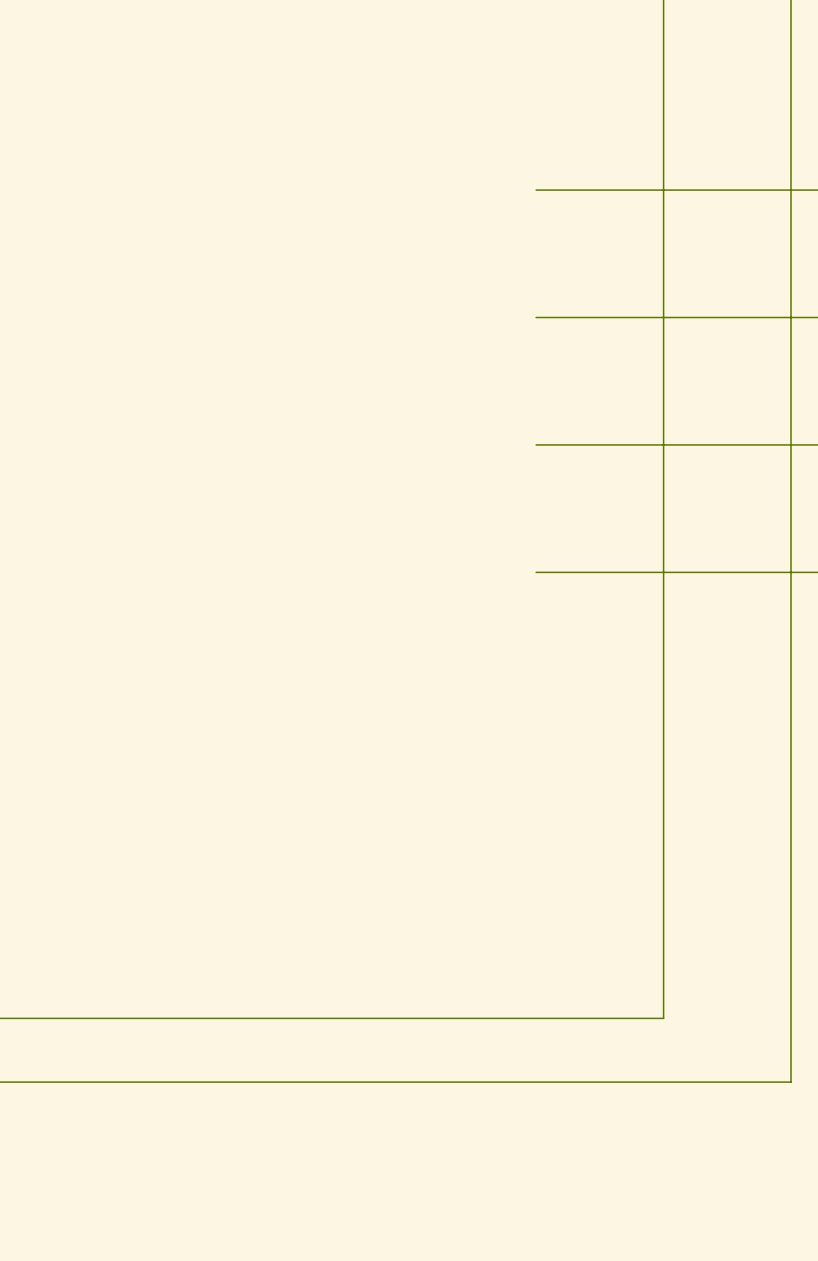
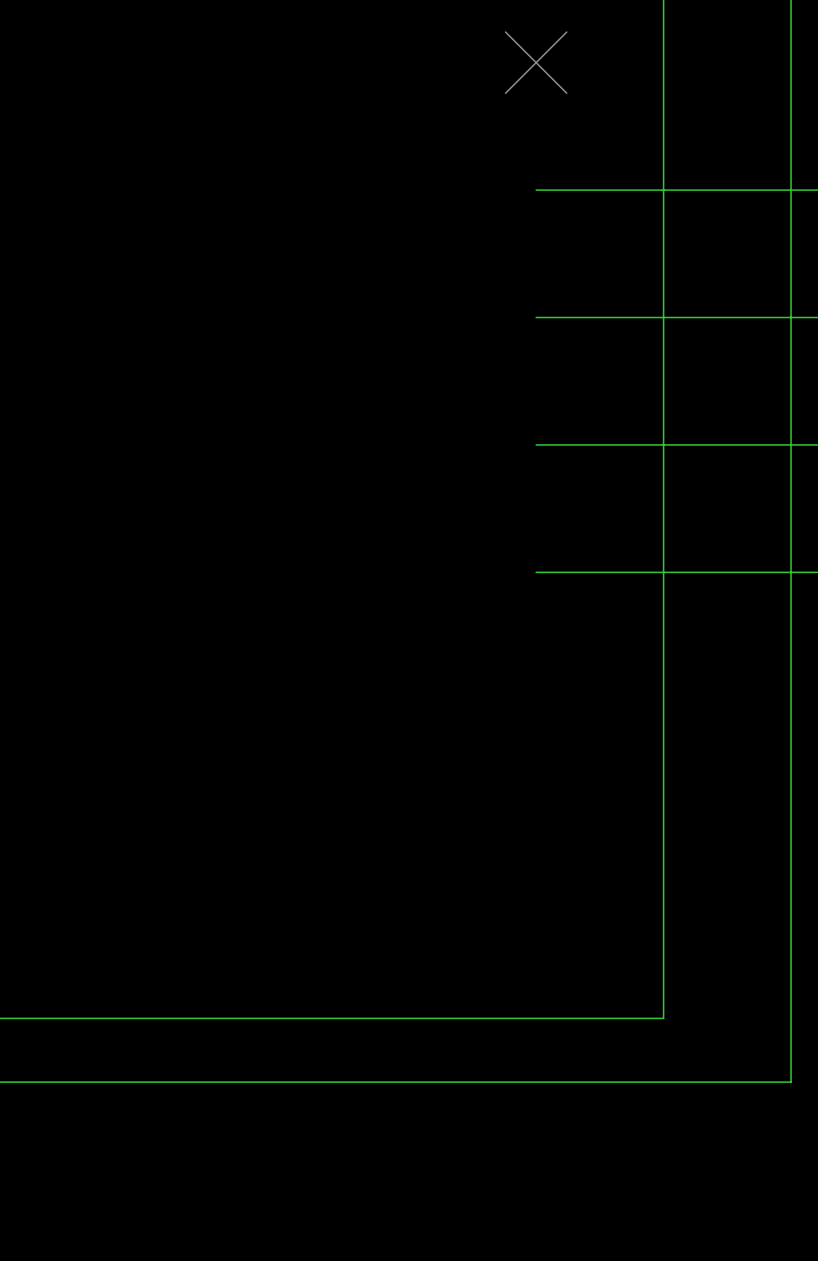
no-connect mark: none -> (536, 62)

